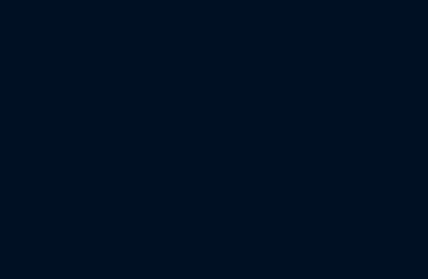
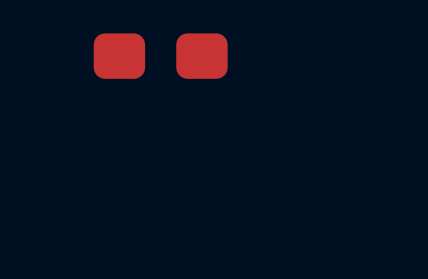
part: none -> (160, 56)

